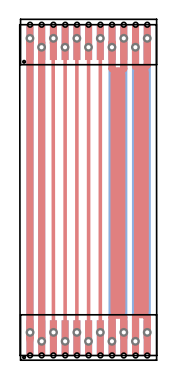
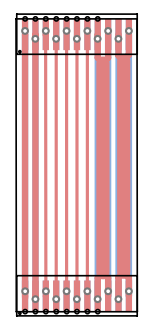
hole: (123, 24) -> none
hole: (135, 24) -> none
hole: (147, 24) -> none
hole: (123, 355) -> none
hole: (135, 355) -> none
hole: (147, 355) -> none

